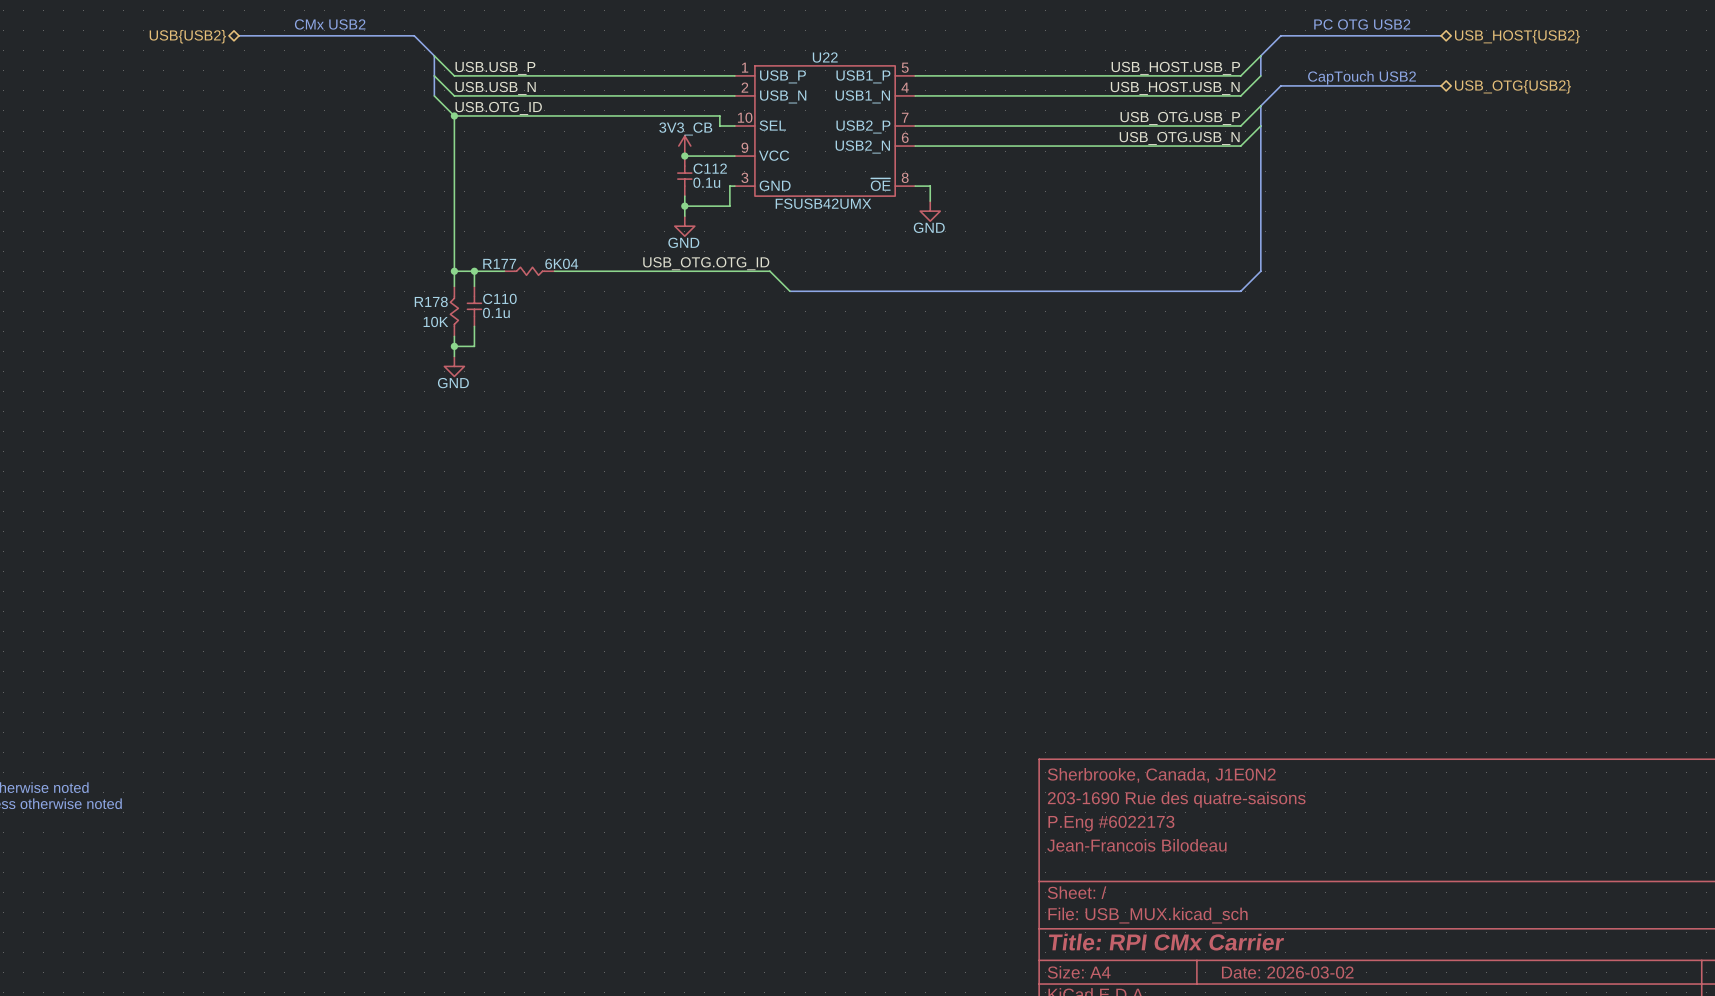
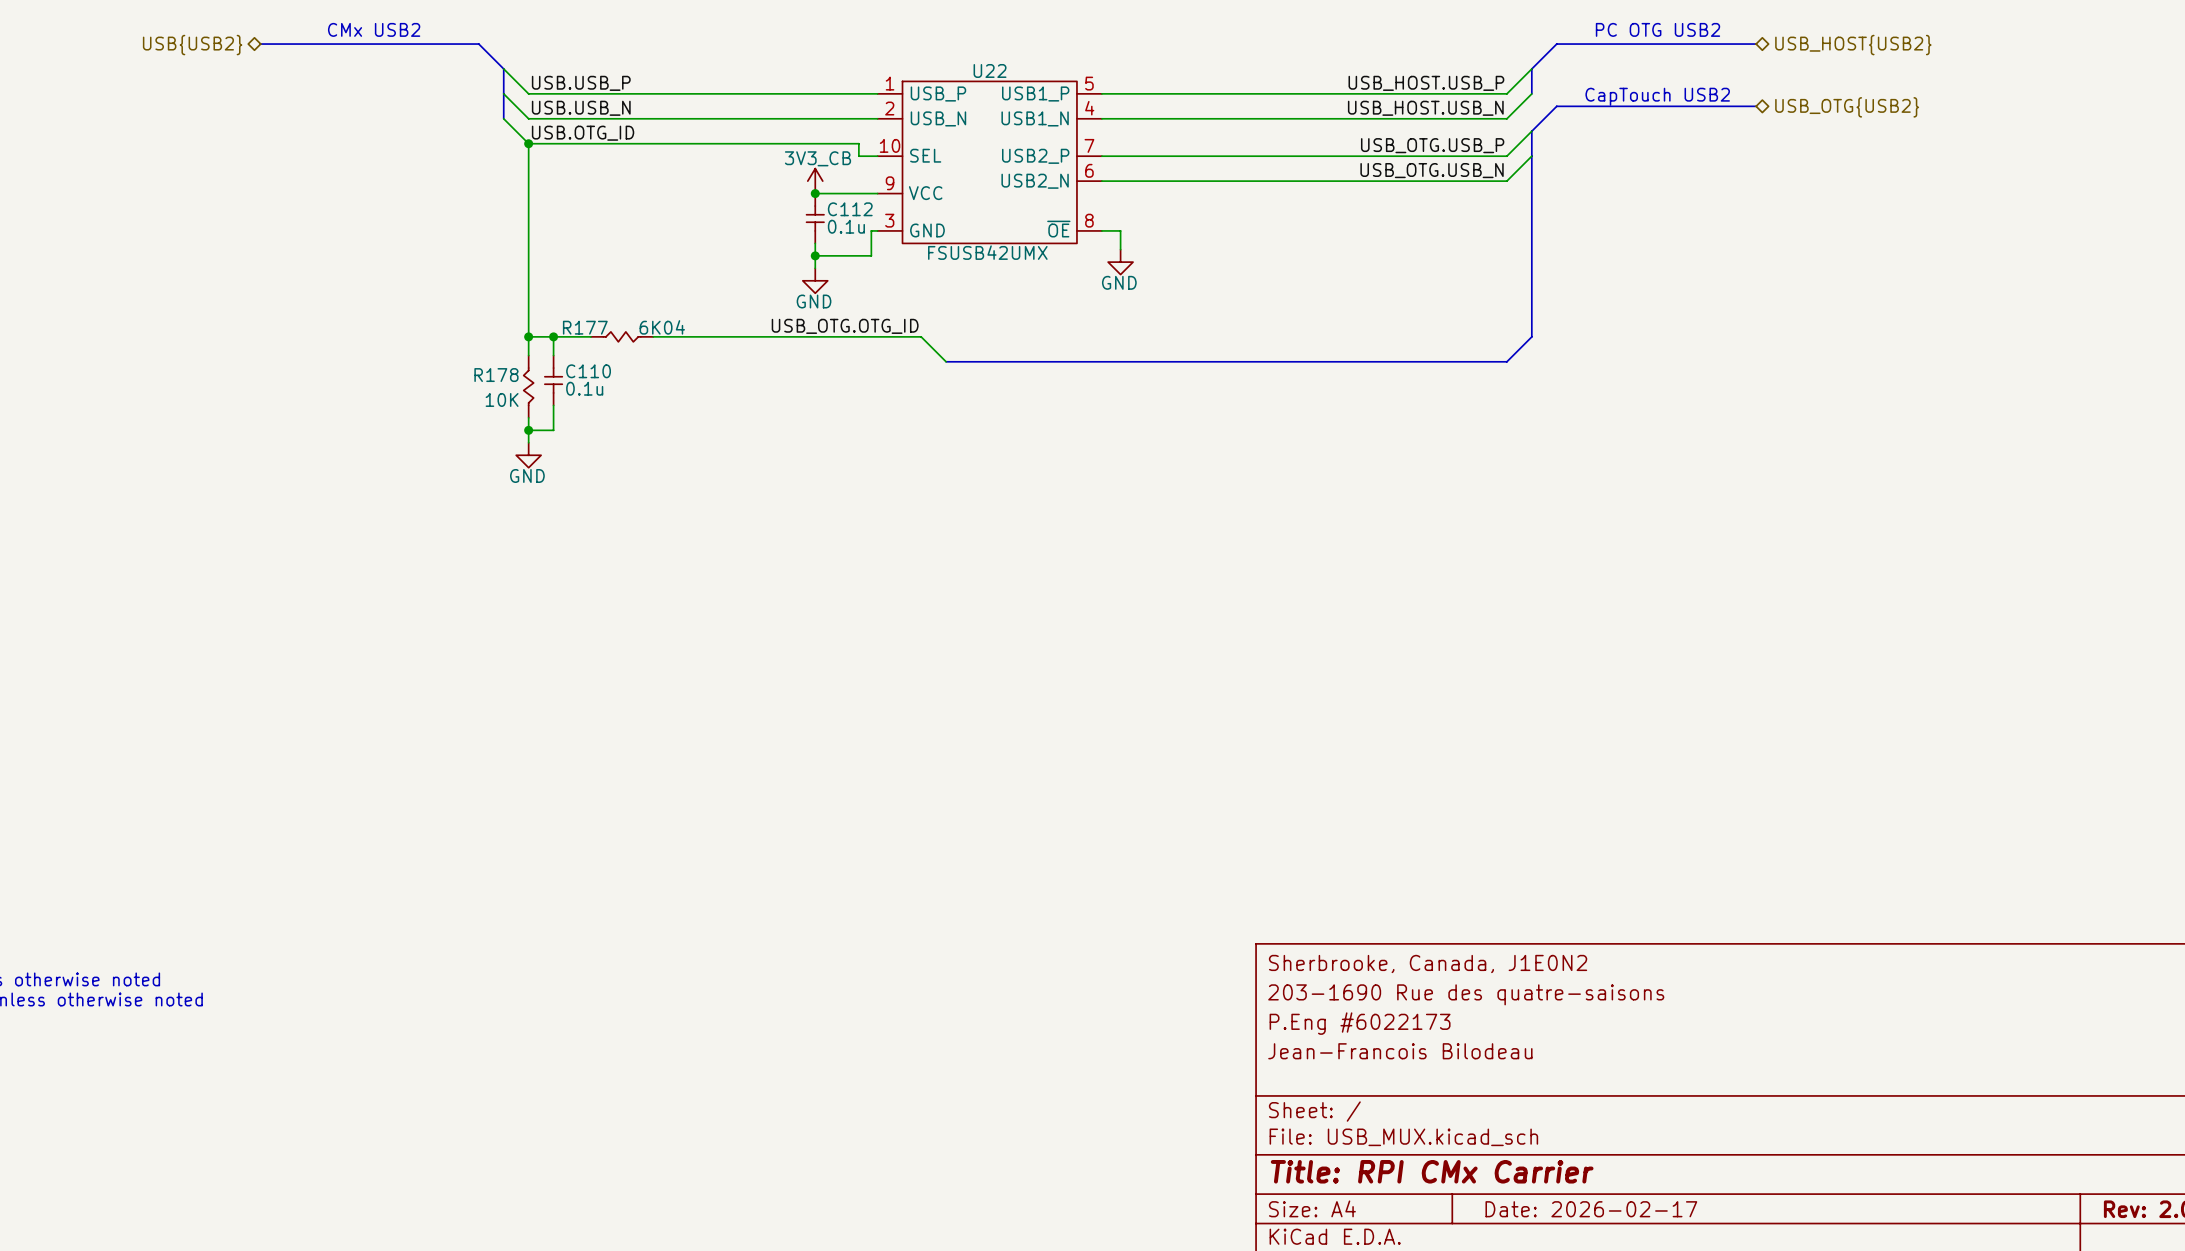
title block: Date: 2026-03-02 (1287, 972) -> Date: 2026-02-17 (1591, 1209)

